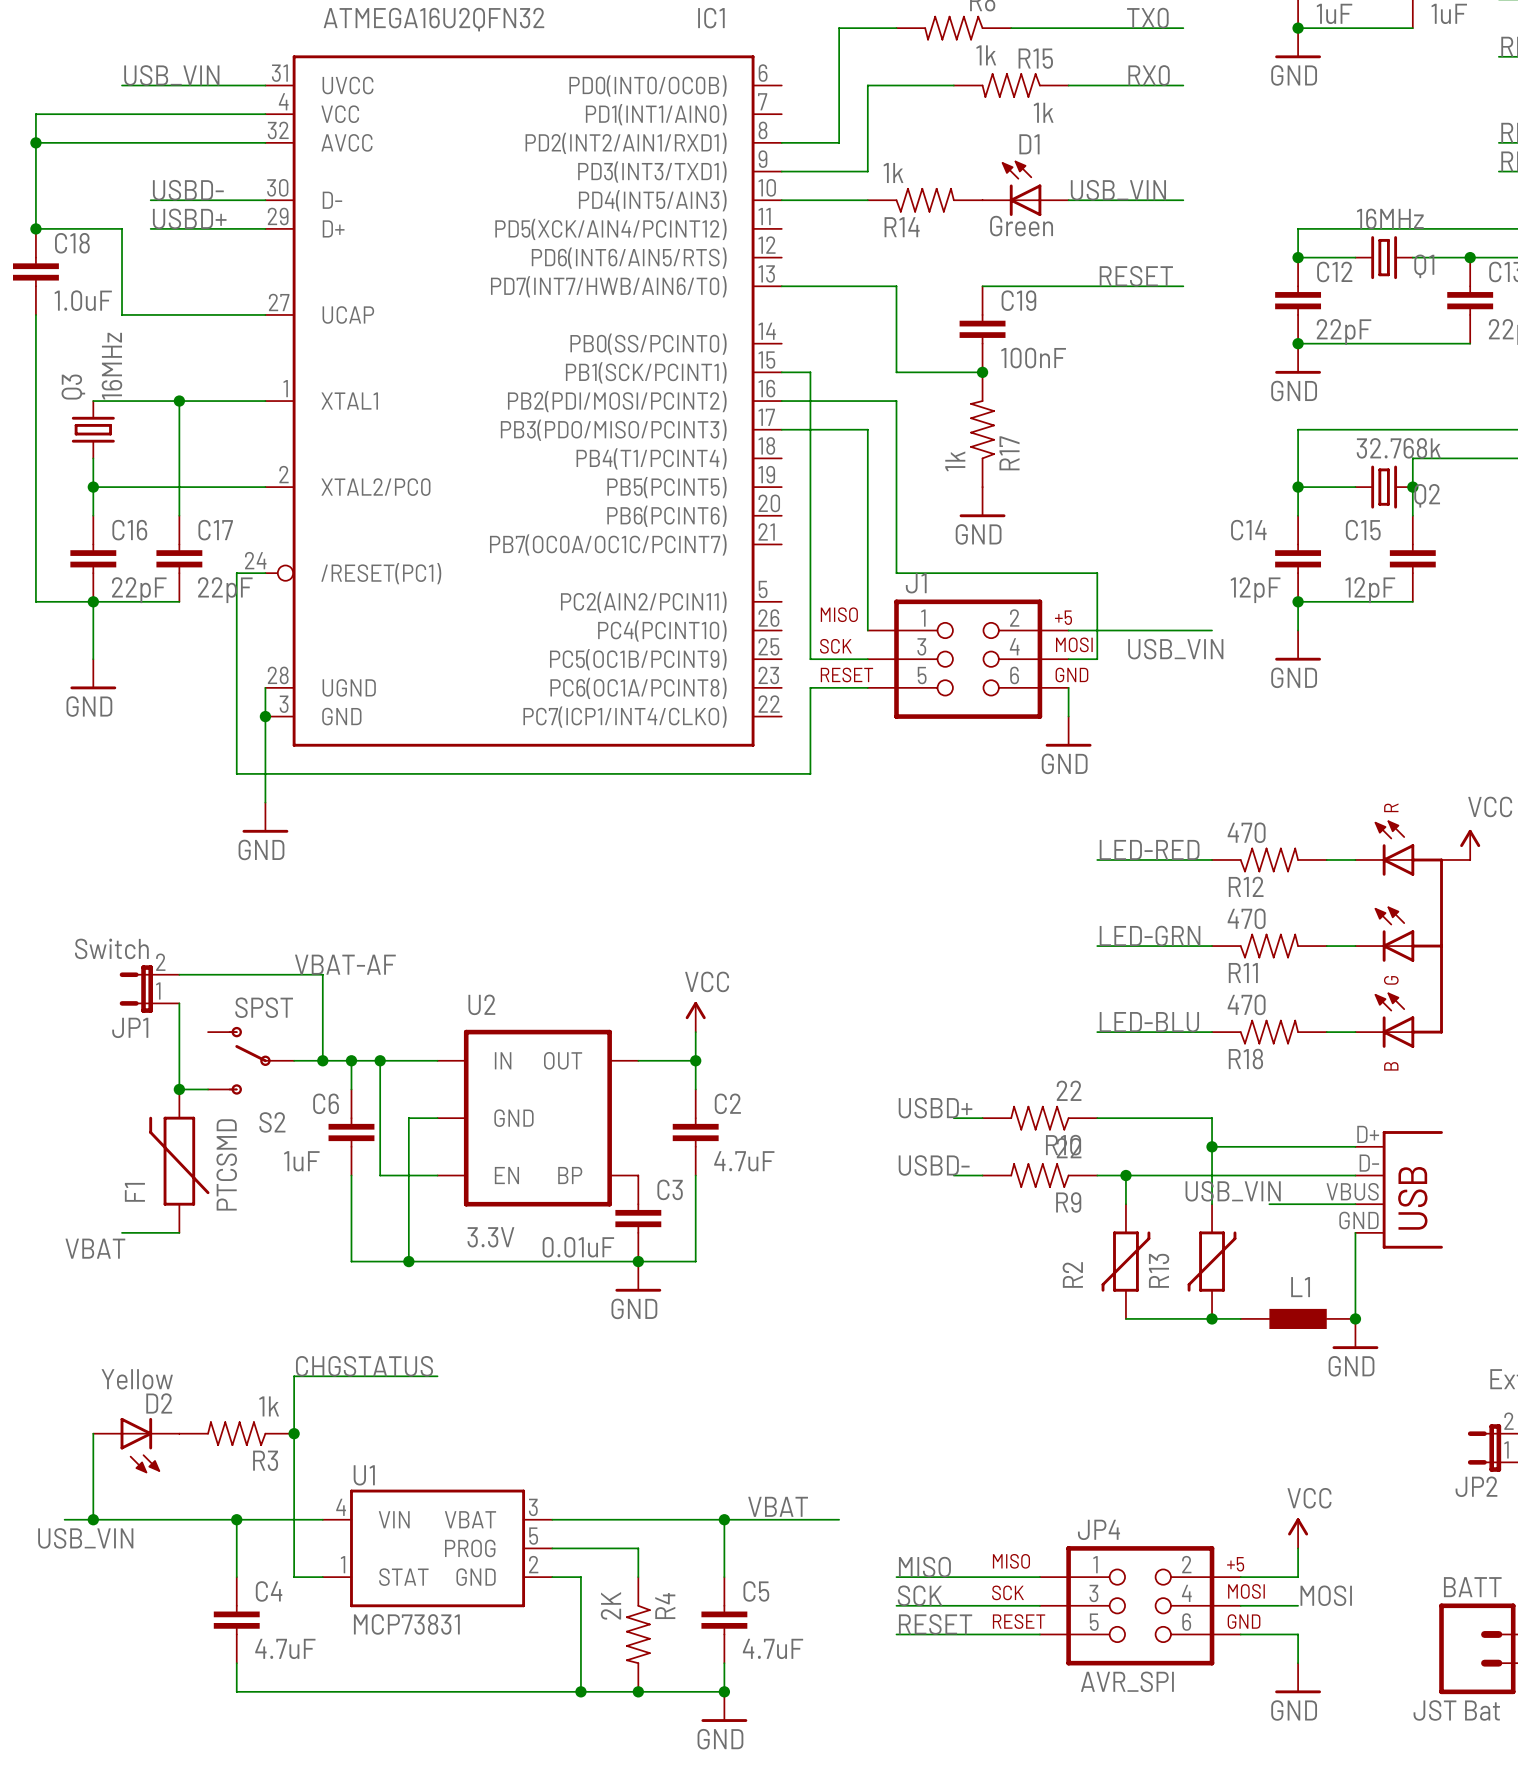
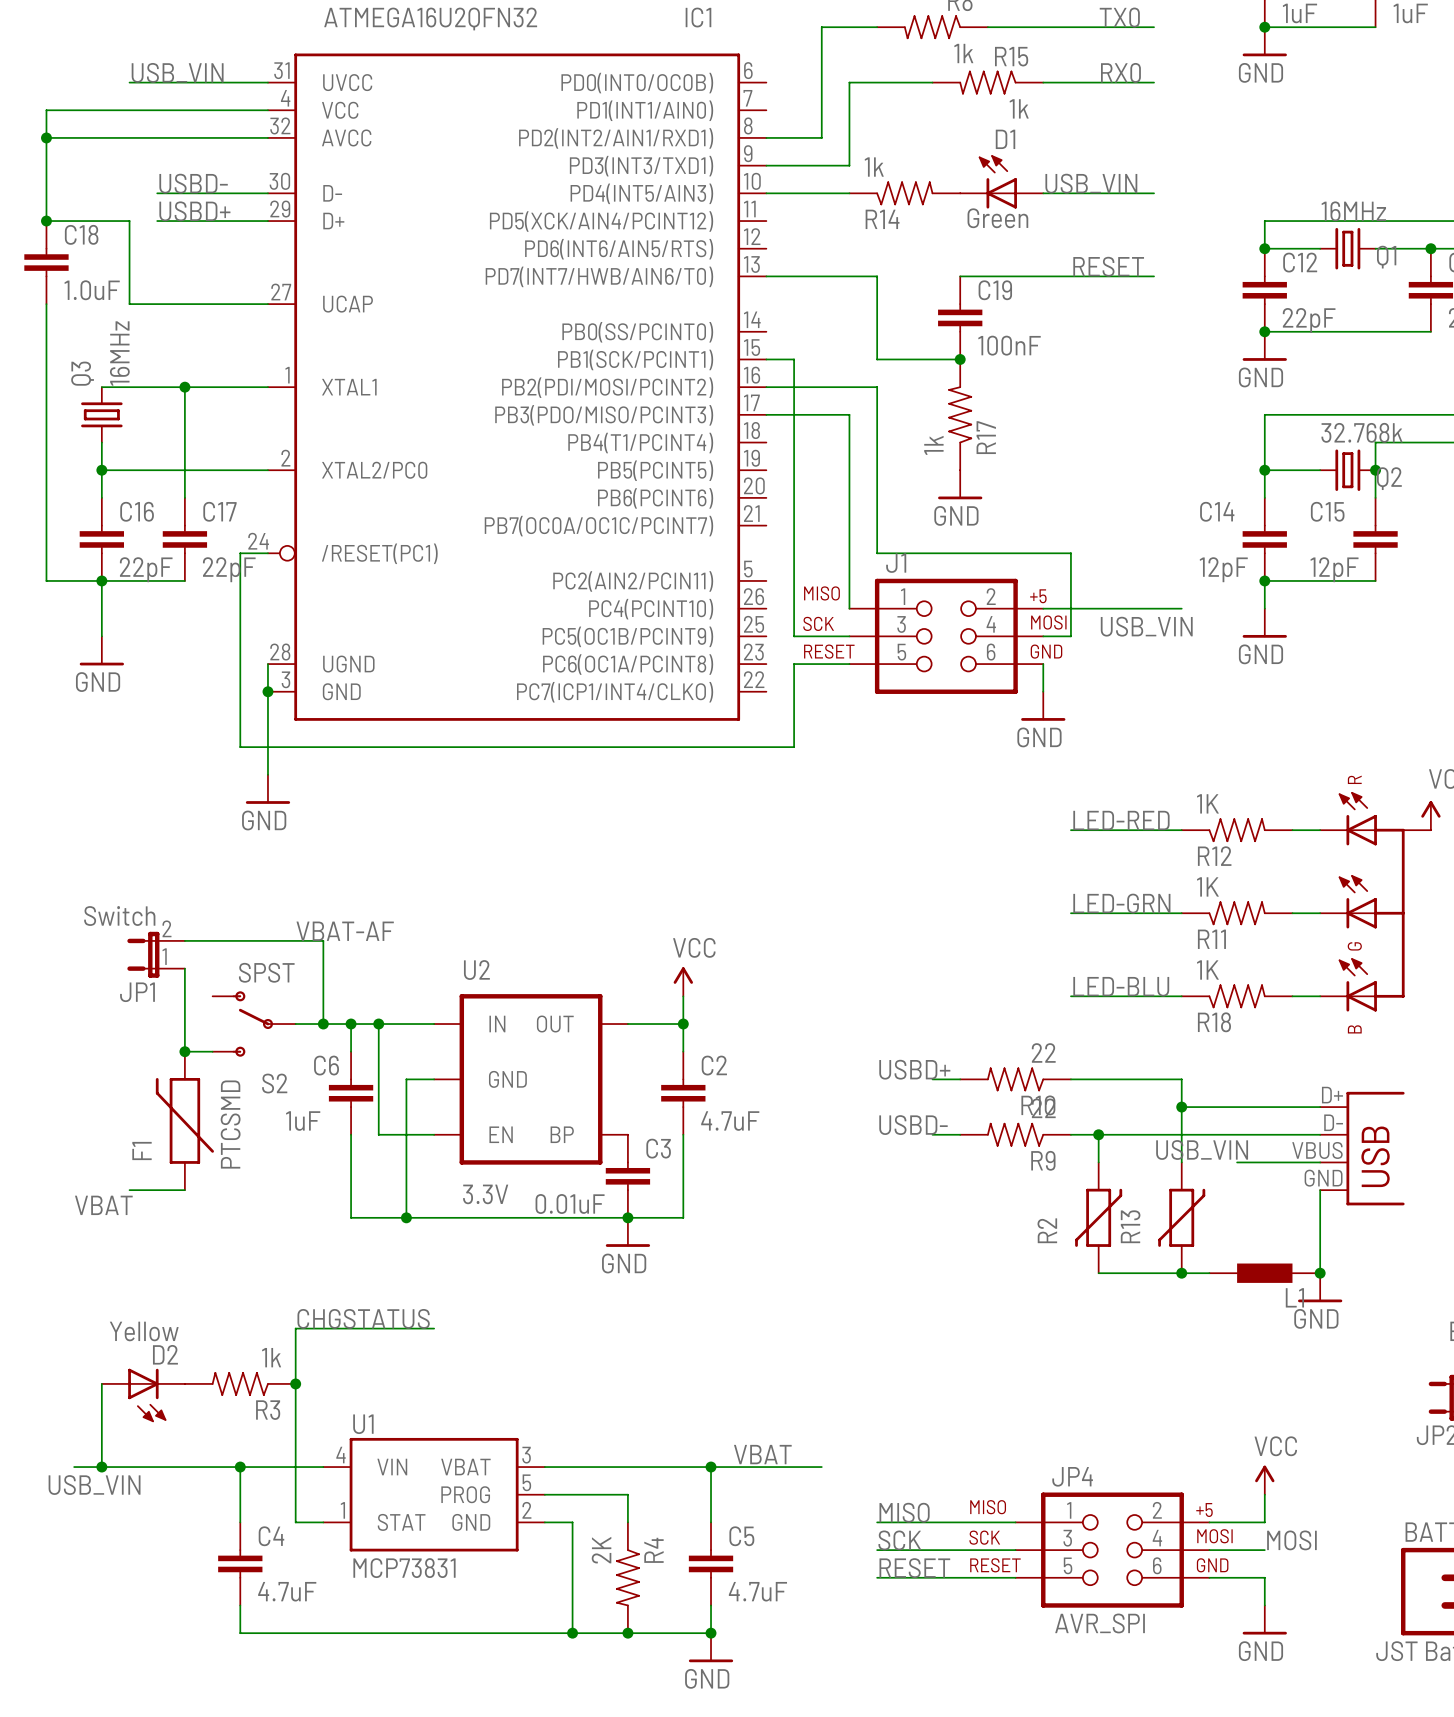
R12 value: 470 (1246, 832) -> 1K (1207, 803)
R11 value: 470 (1246, 918) -> 1K (1207, 886)
R18 value: 470 (1246, 1004) -> 1K (1207, 970)
L1 name position: L1 (1300, 1287) -> L1 (1294, 1297)

